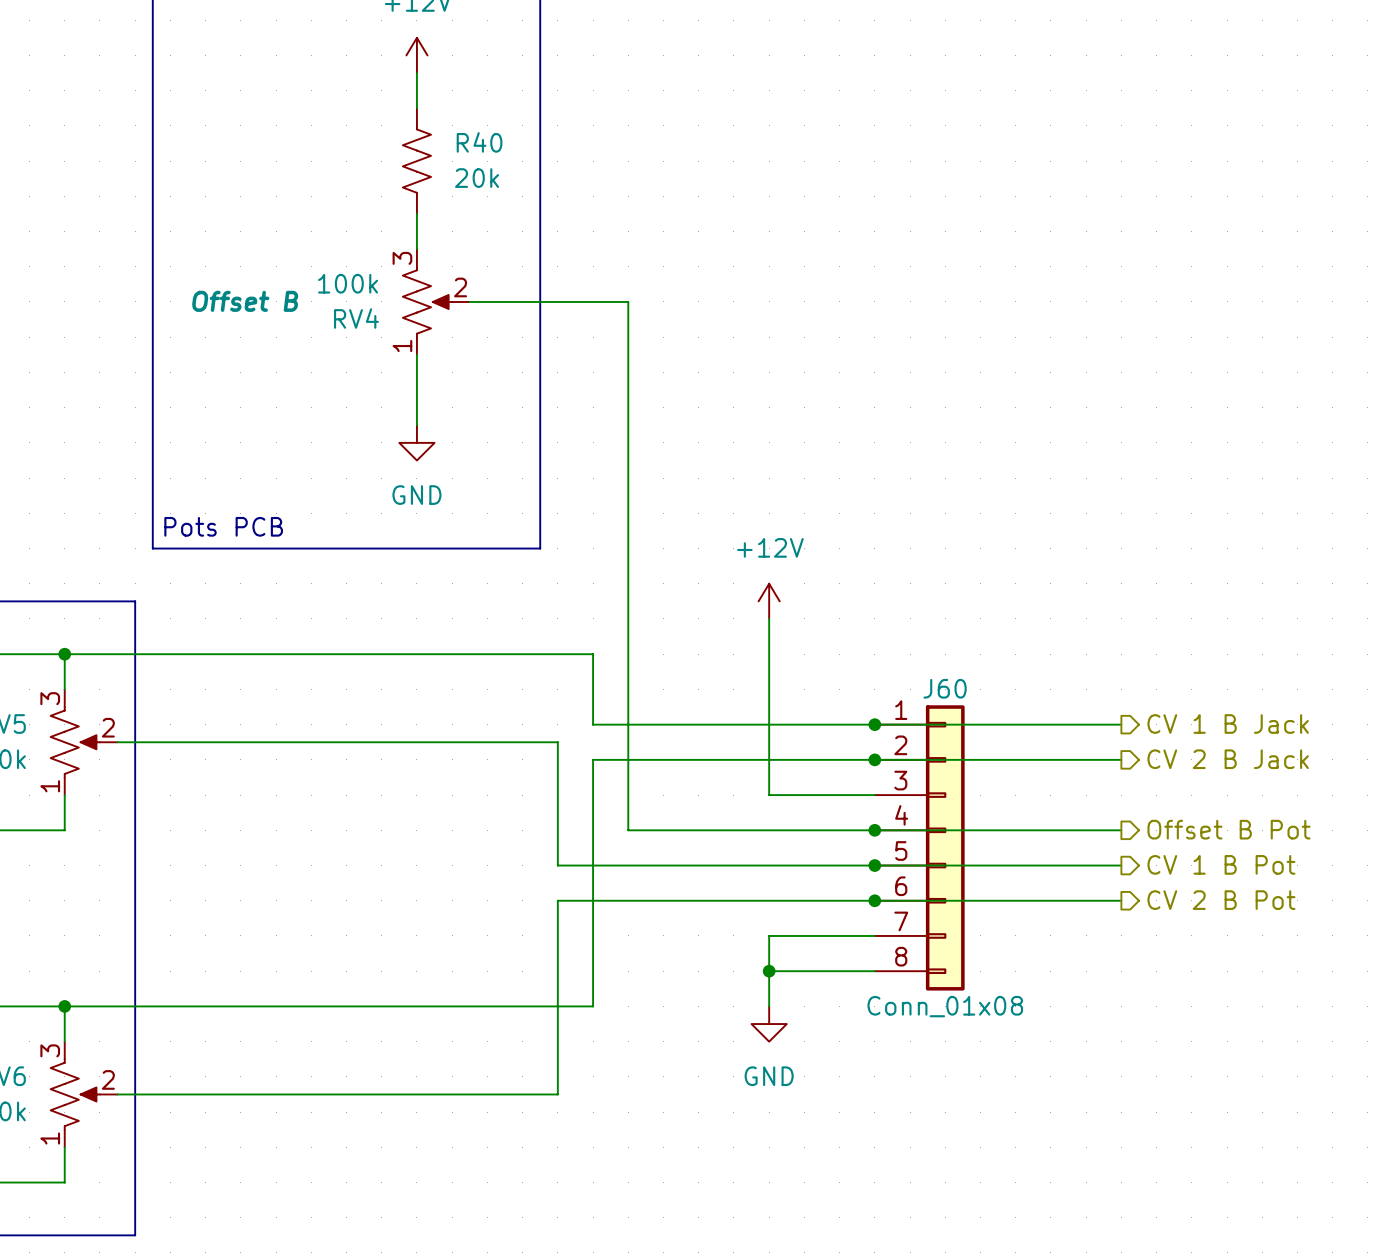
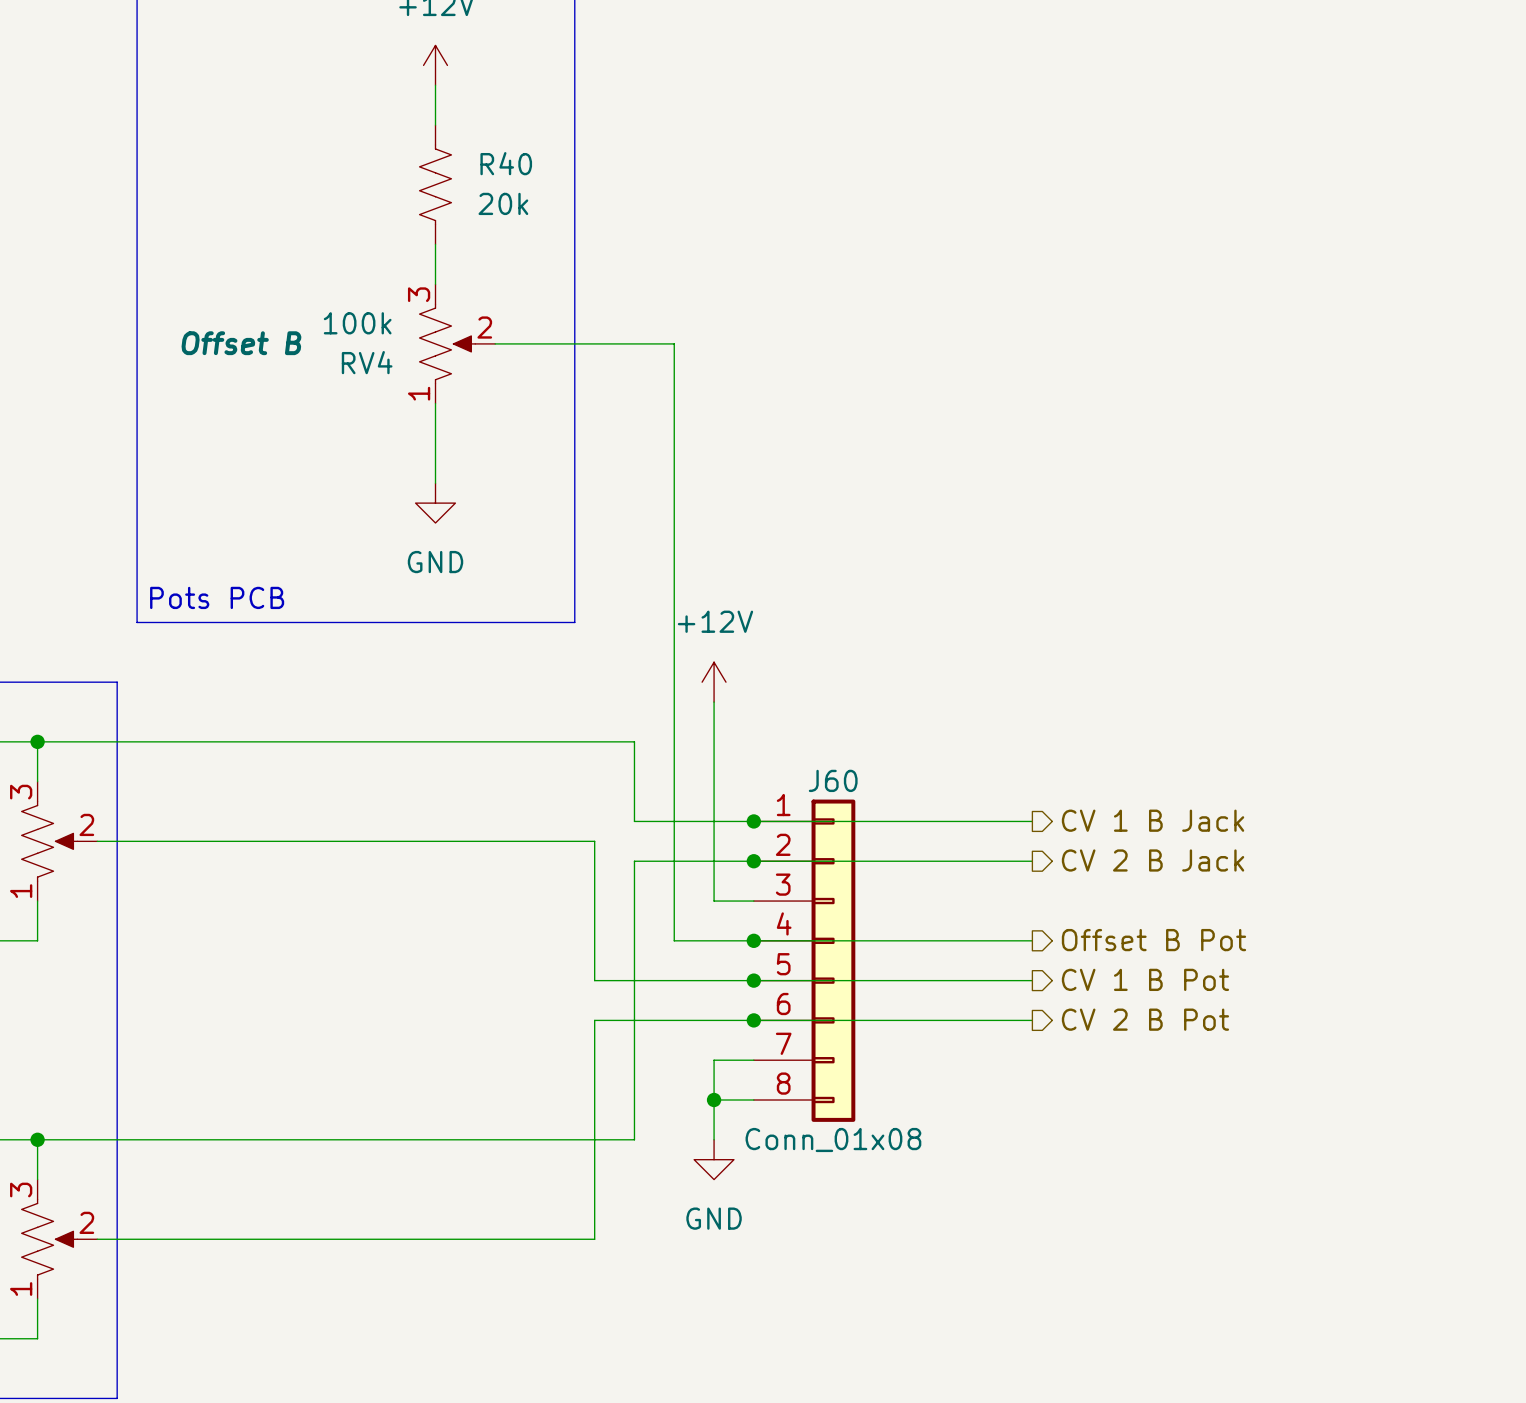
power symbol position: +12V (769, 601) -> +12V (714, 682)
wire: none -> (714, 702) (714, 901) (753, 901)
wire: (769, 618) (769, 795) (874, 795) -> none
hierarchical label position: CV 1 B Jack (1228, 723) -> CV 1 B Jack (1153, 820)
junction: none -> (753, 821)
junction: (874, 724) -> none
wire: (945, 724) (1121, 724) -> none
junction: none -> (753, 861)
junction: (874, 759) -> none
wire: (945, 759) (1121, 759) -> none
hierarchical label position: CV 2 B Jack (1228, 759) -> CV 2 B Jack (1153, 860)
hierarchical label position: Offset B Pot (1228, 829) -> Offset B Pot (1153, 940)
junction: none -> (753, 940)
junction: (874, 830) -> none
wire: (945, 830) (1121, 830) -> none
J60 position: (919, 847) -> (804, 960)
hierarchical label position: CV 1 B Pot (1221, 864) -> CV 1 B Pot (1145, 979)
junction: none -> (753, 980)
junction: (874, 865) -> none
wire: (945, 865) (1121, 865) -> none
junction: none -> (753, 1020)
junction: (874, 900) -> none
wire: (945, 900) (1121, 900) -> none
hierarchical label position: CV 2 B Pot (1221, 900) -> CV 2 B Pot (1145, 1019)
wire: none -> (753, 1060) (714, 1060) (714, 1139)
wire: (874, 935) (769, 935) (769, 1006) -> none
wire: none -> (714, 1099) (753, 1099)
junction: none -> (714, 1099)
wire: (769, 971) (874, 971) -> none
junction: (769, 971) -> none
power symbol position: GND (769, 1024) -> GND (714, 1159)

